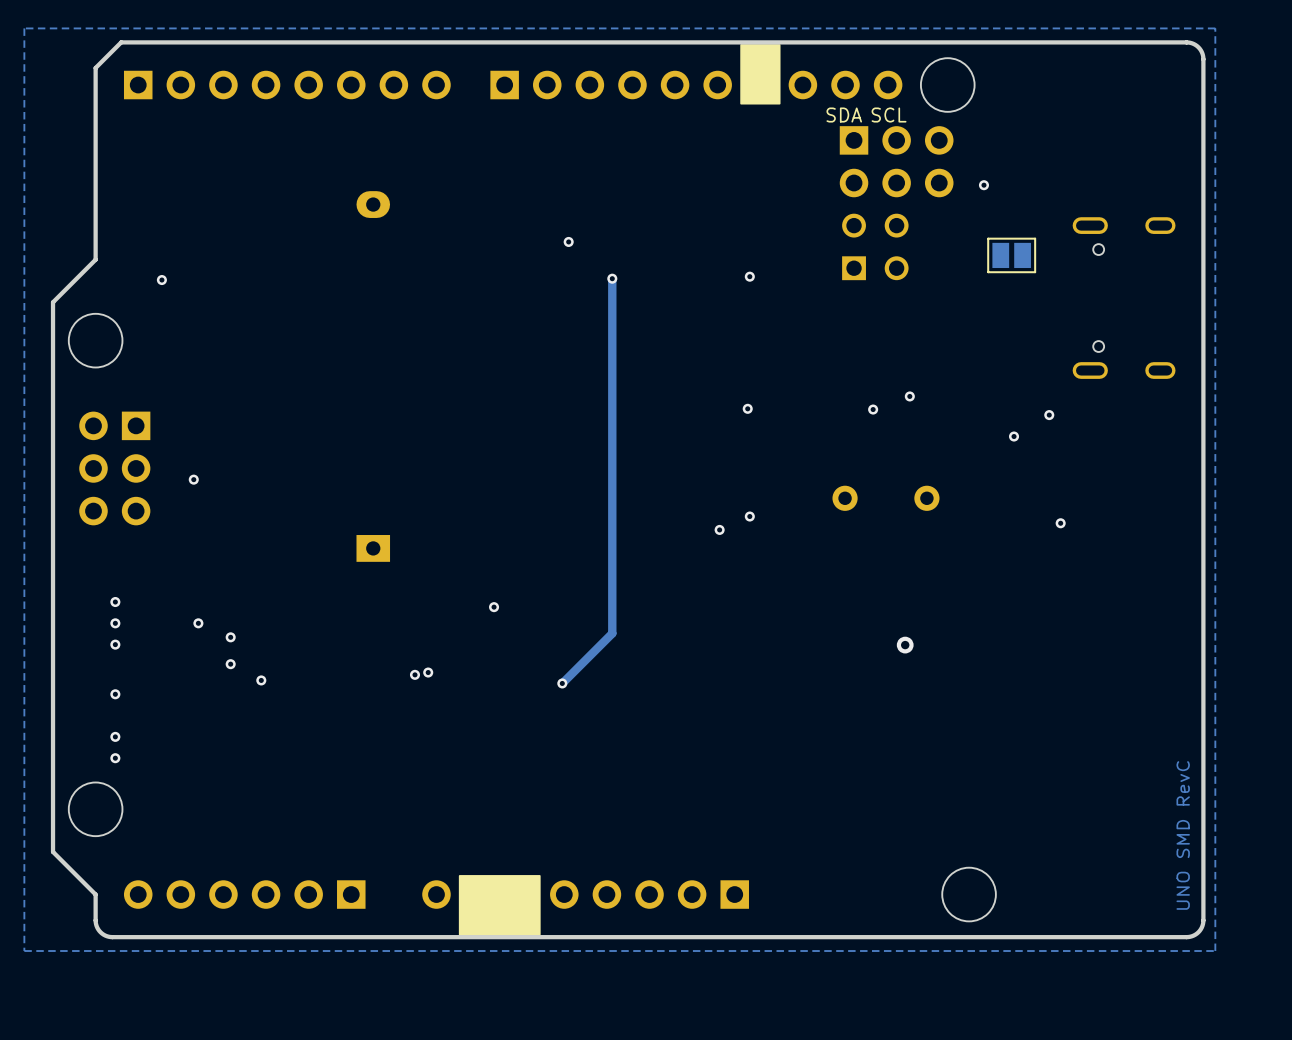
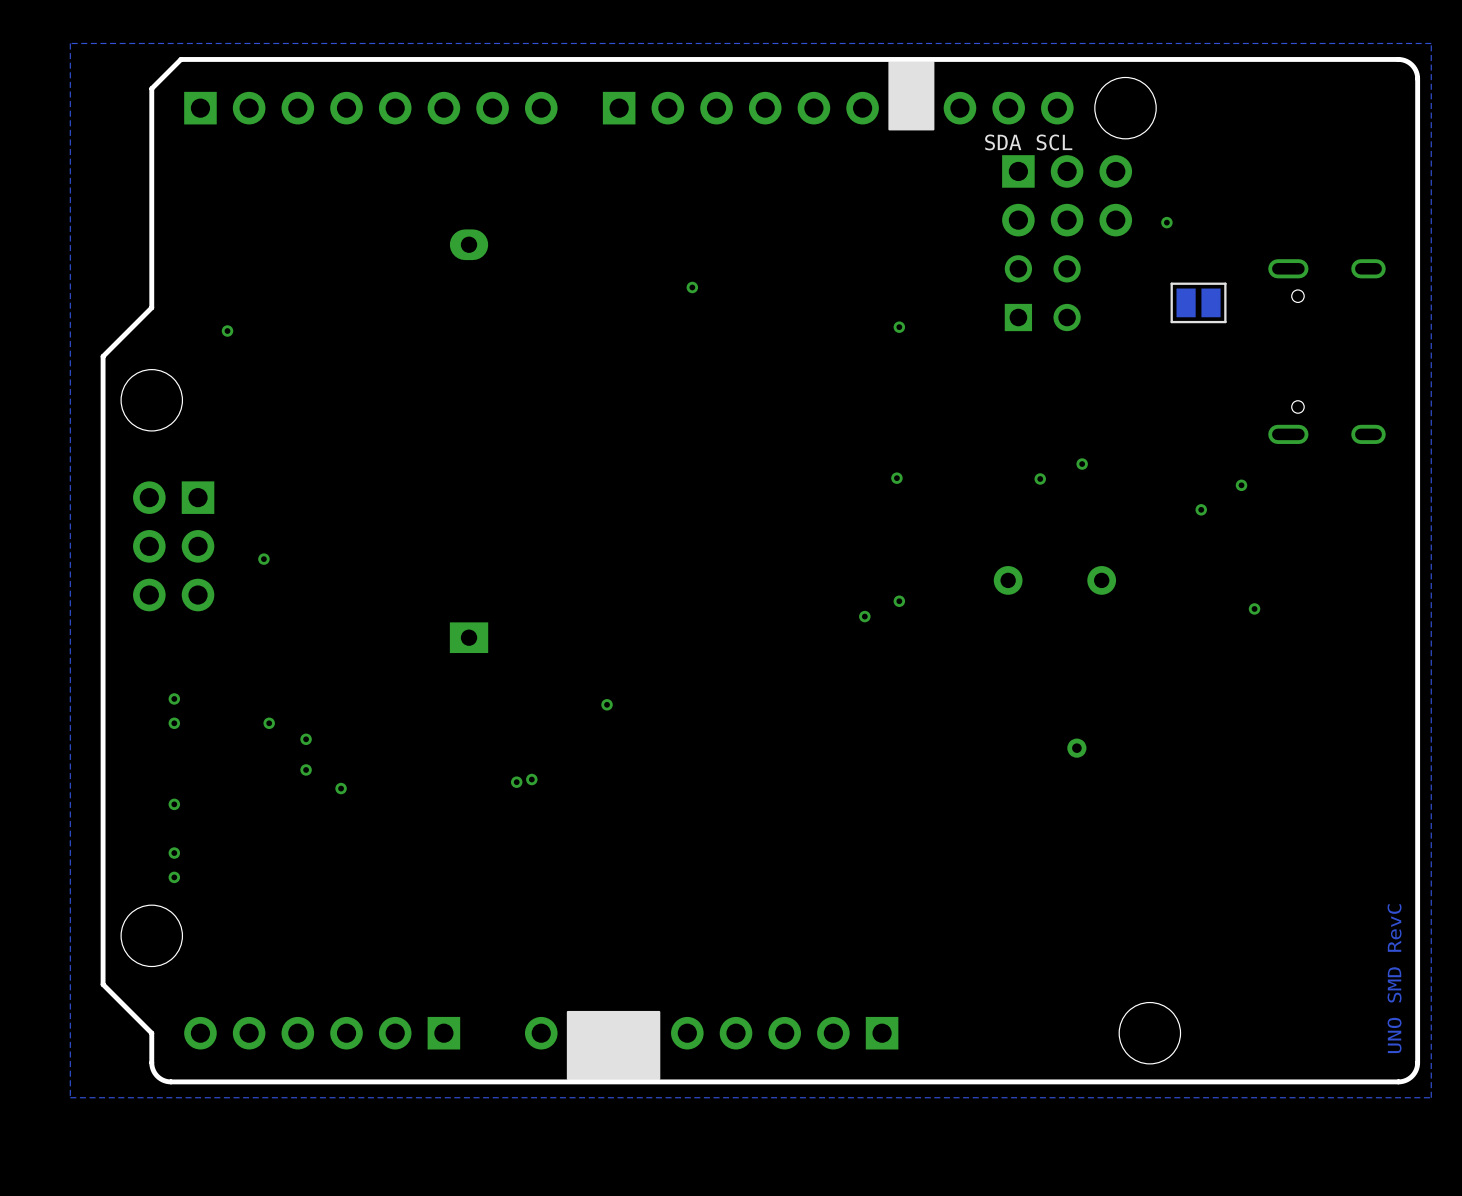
track: (612, 278) (612, 633) (562, 683) -> none
via: (612, 278) -> none
via: (115, 644) -> none
via: (562, 683) -> none

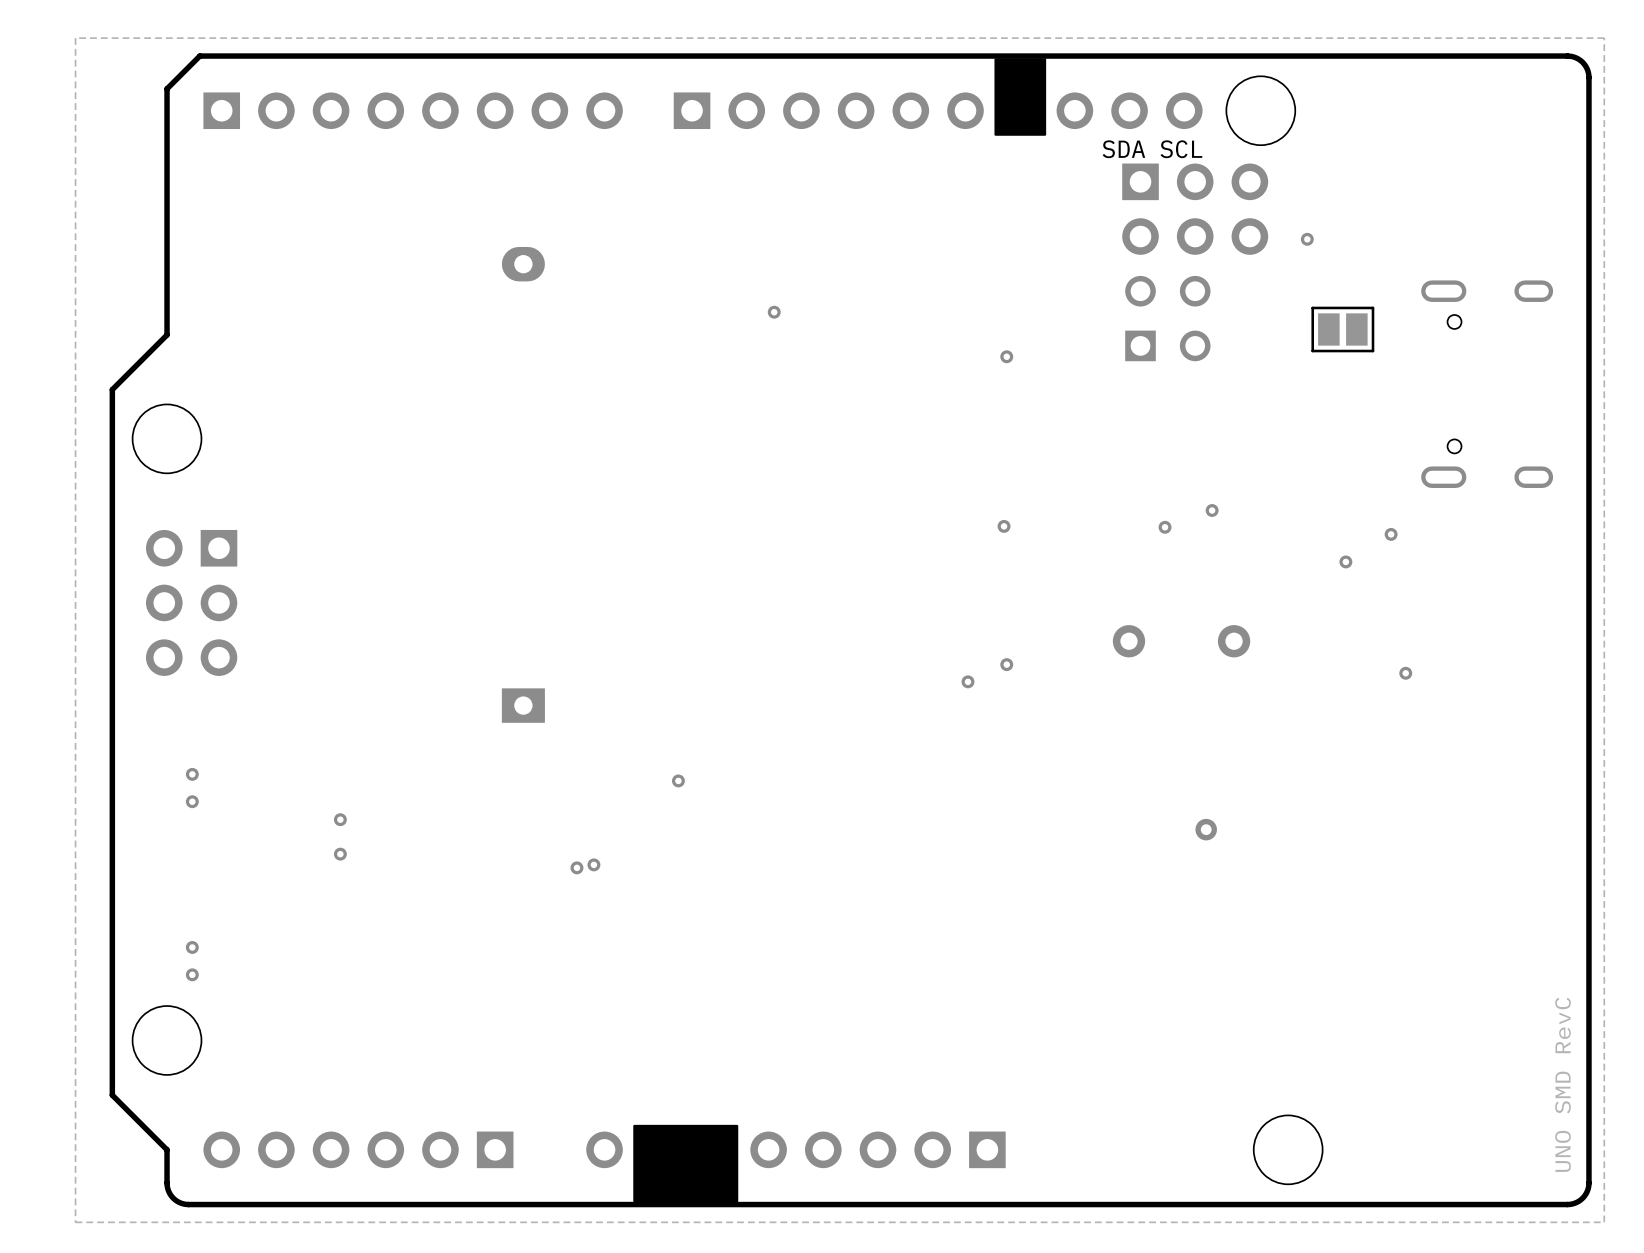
via: (227, 331) -> none
via: (263, 559) -> none
via: (269, 723) -> none
via: (341, 788) -> none
via: (174, 804) -> none

